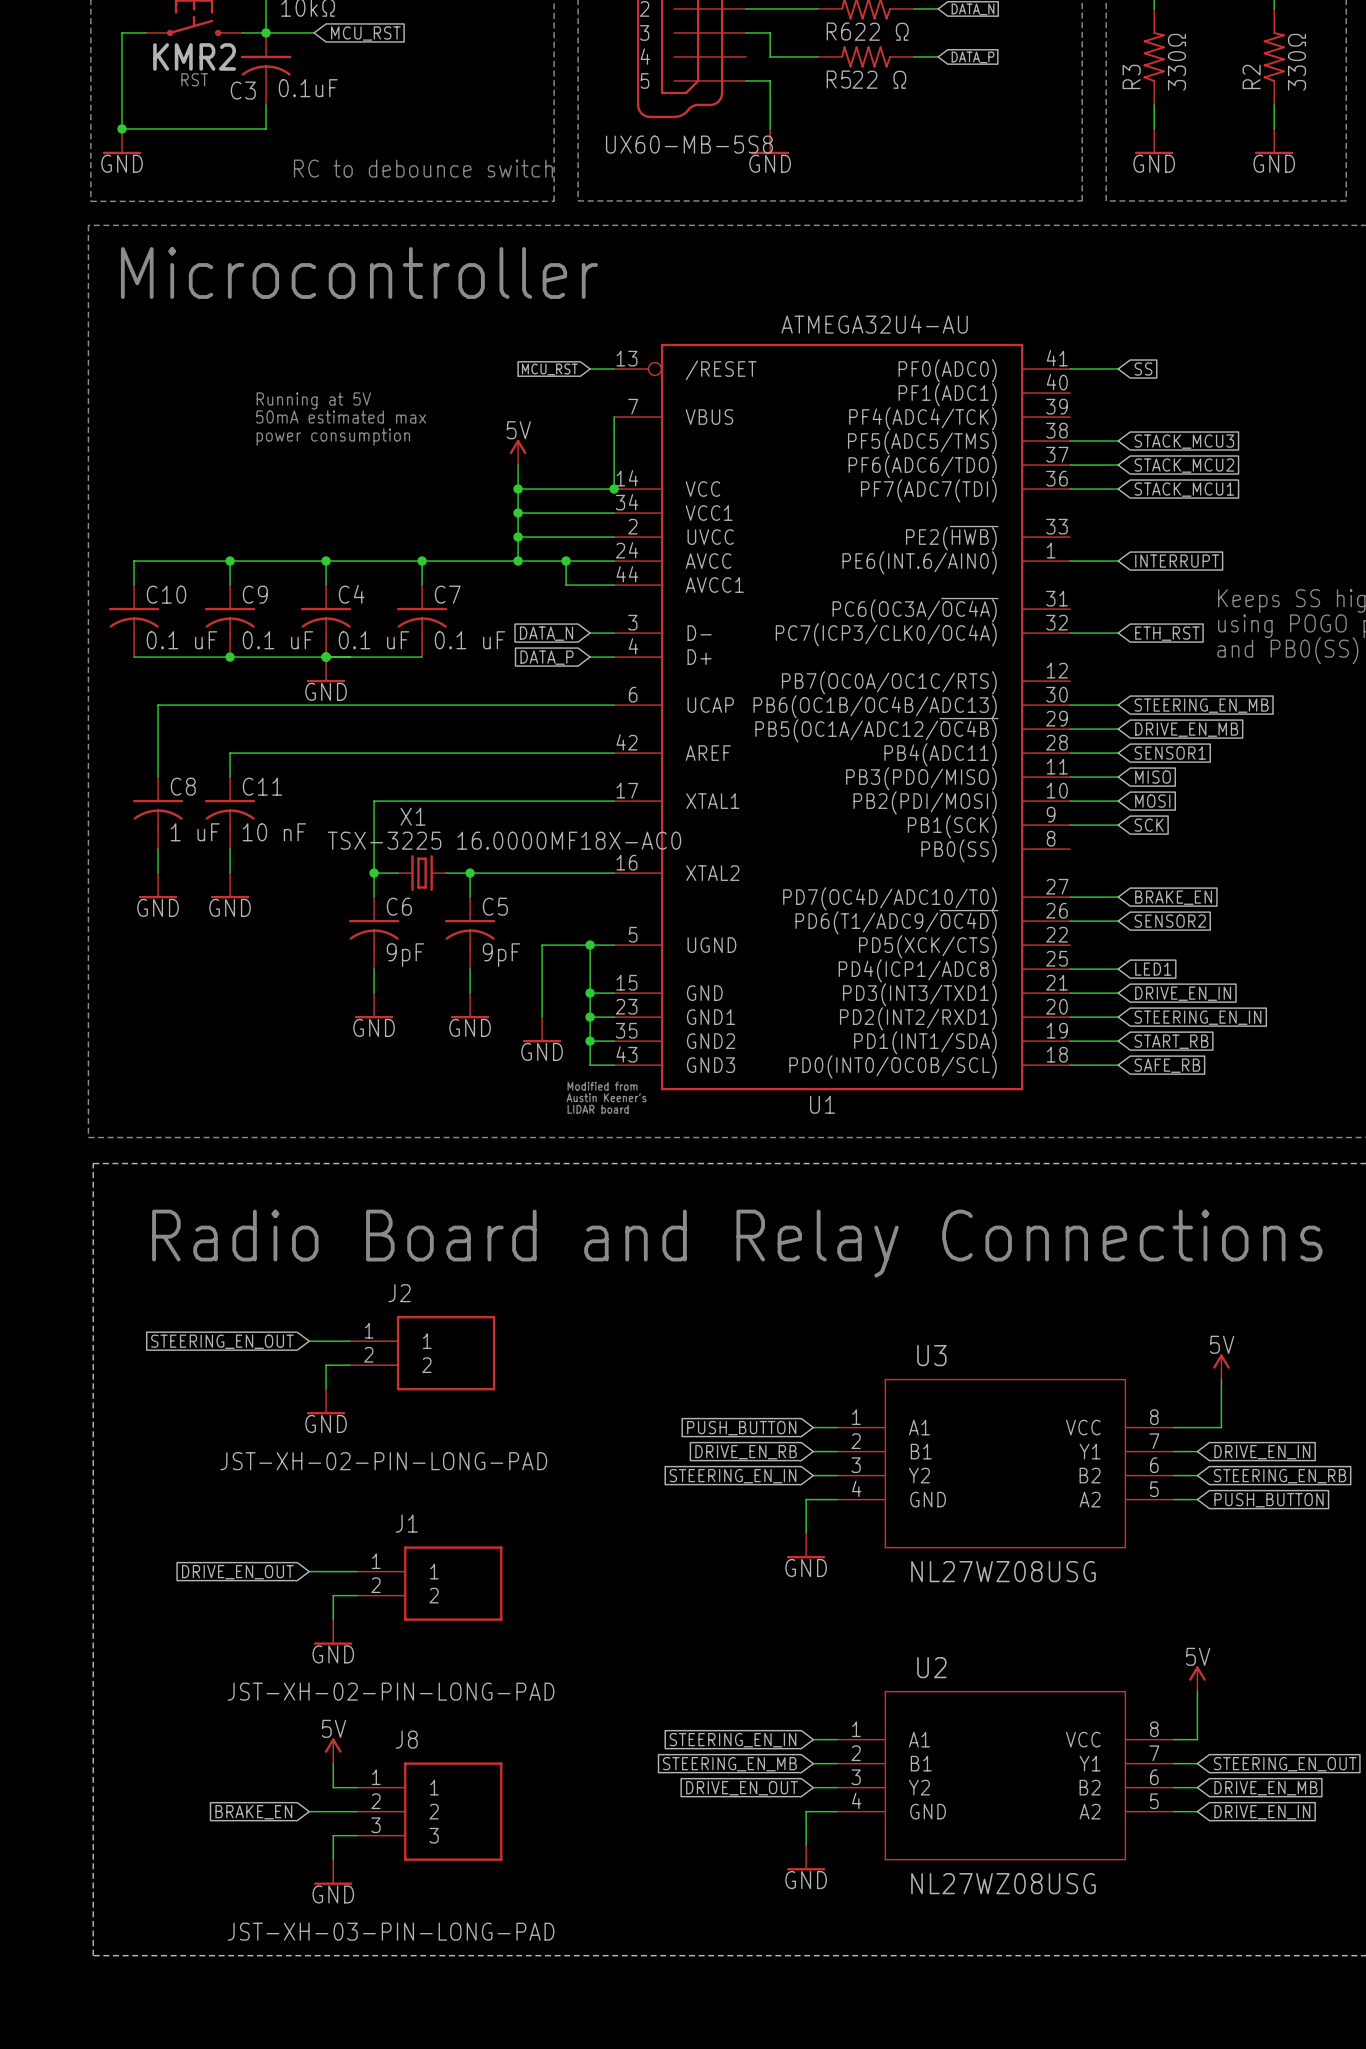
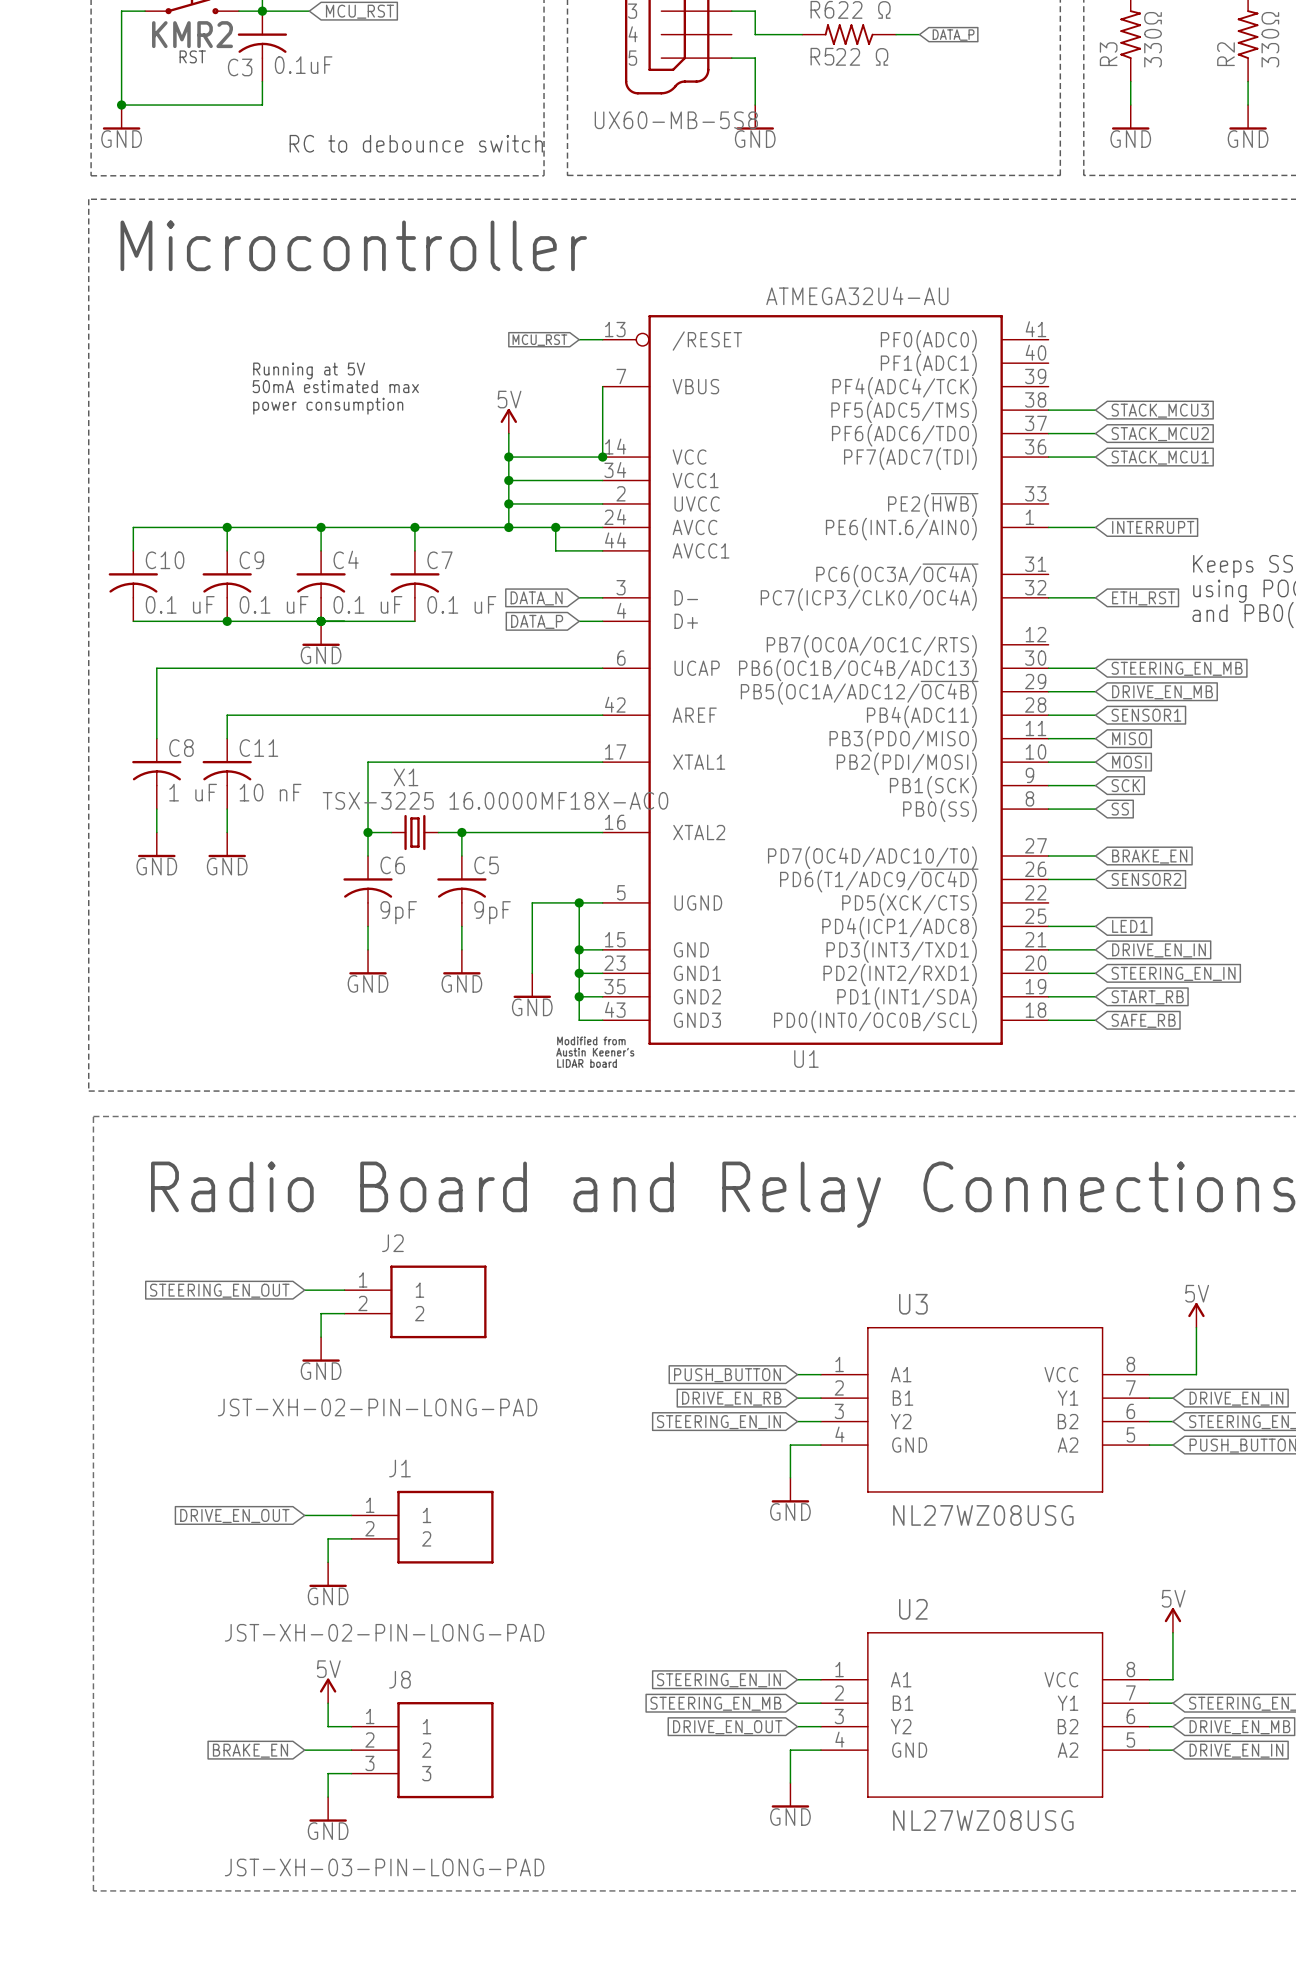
wire: (1070, 369) (1118, 369) -> none
global label: SS (1143, 369) -> none
wire: none -> (1048, 809) (1095, 809)
global label: none -> SS (1120, 809)

